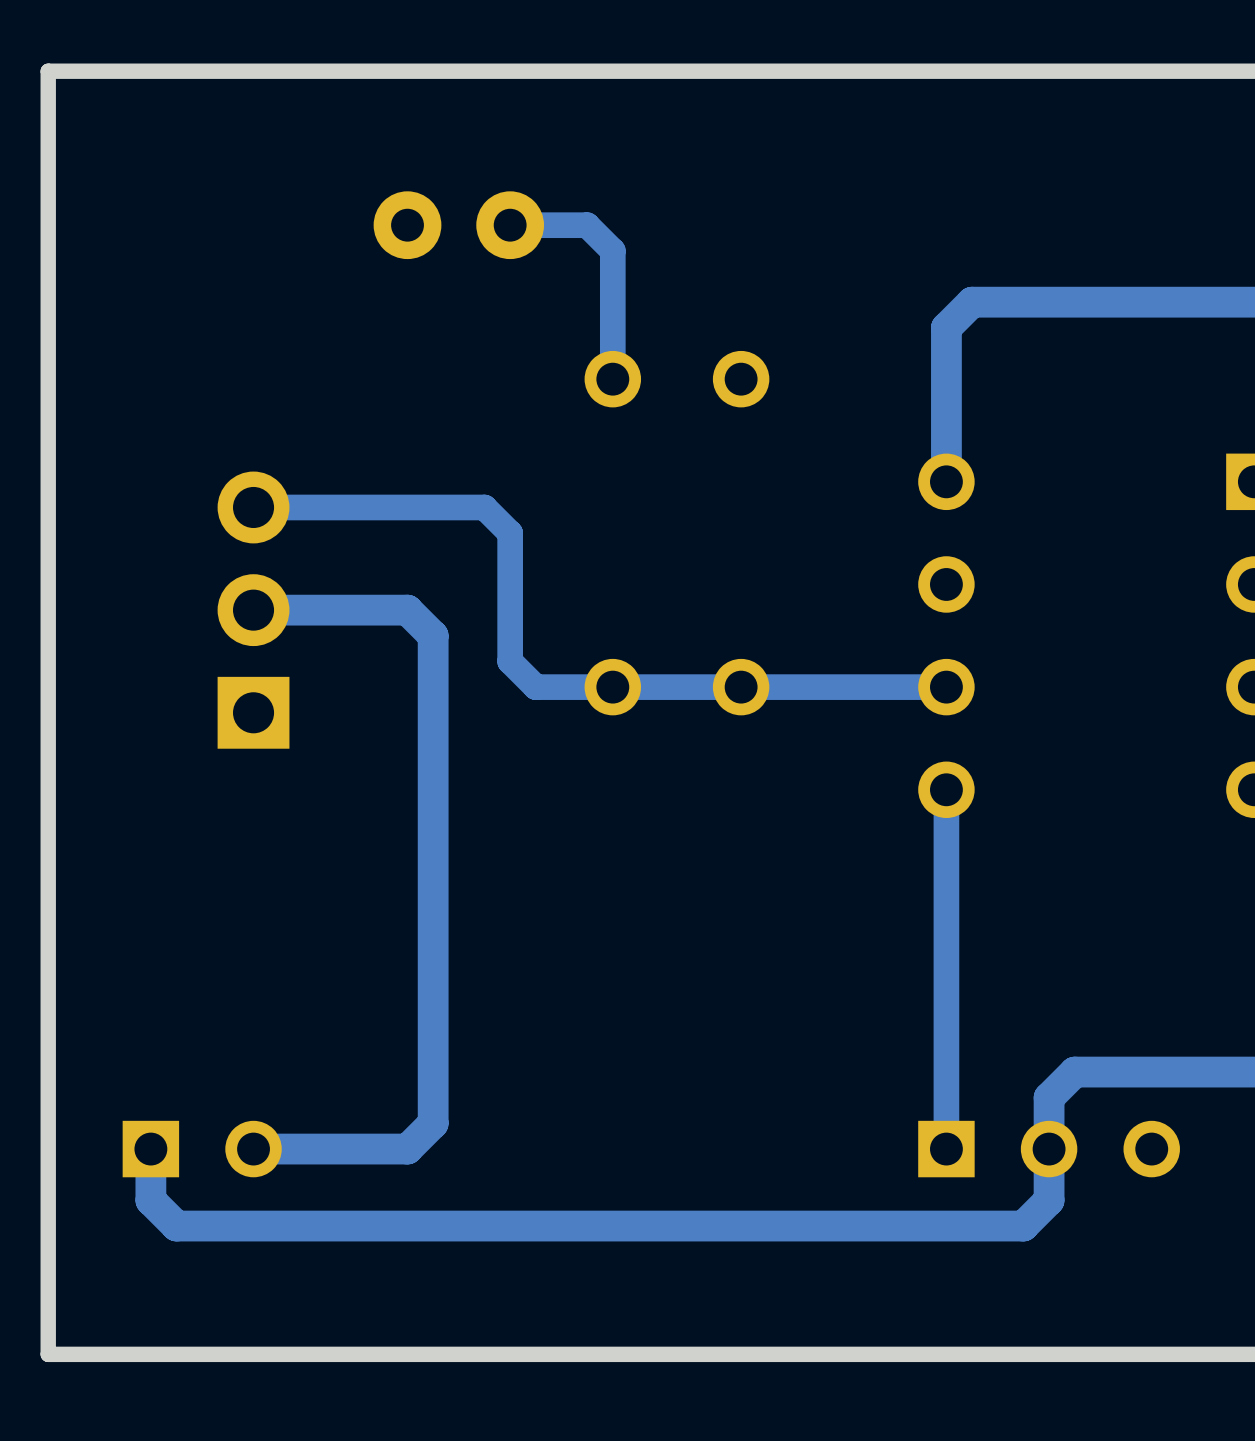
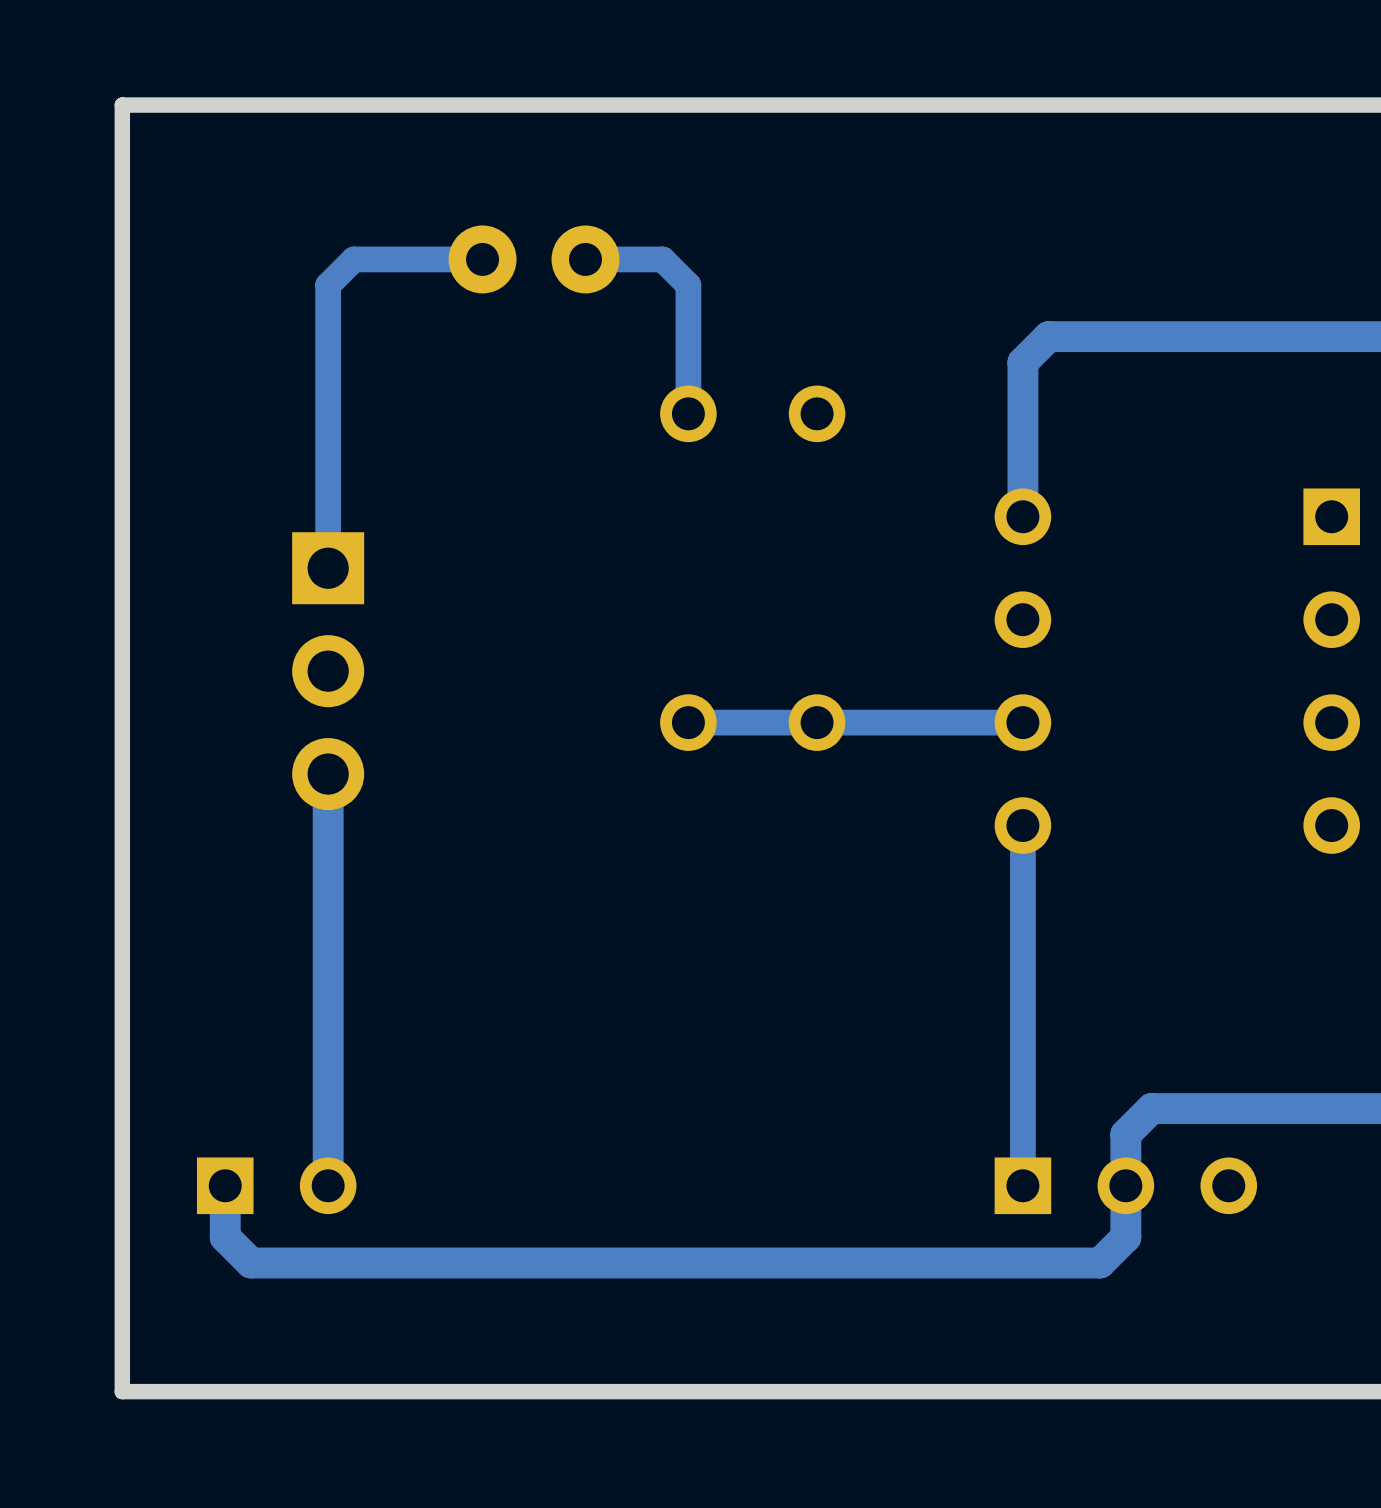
track: none -> (482, 259) (353, 259) (328, 285) (328, 568)
track: (253, 507) (484, 507) (510, 533) (510, 661) (535, 687) (612, 687) -> none
track: (253, 610) (407, 610) (433, 635) (433, 1123) (407, 1149) (253, 1149) -> (328, 774) (328, 1185)
part rotation: 0° (253, 610) -> 180° (328, 671)

